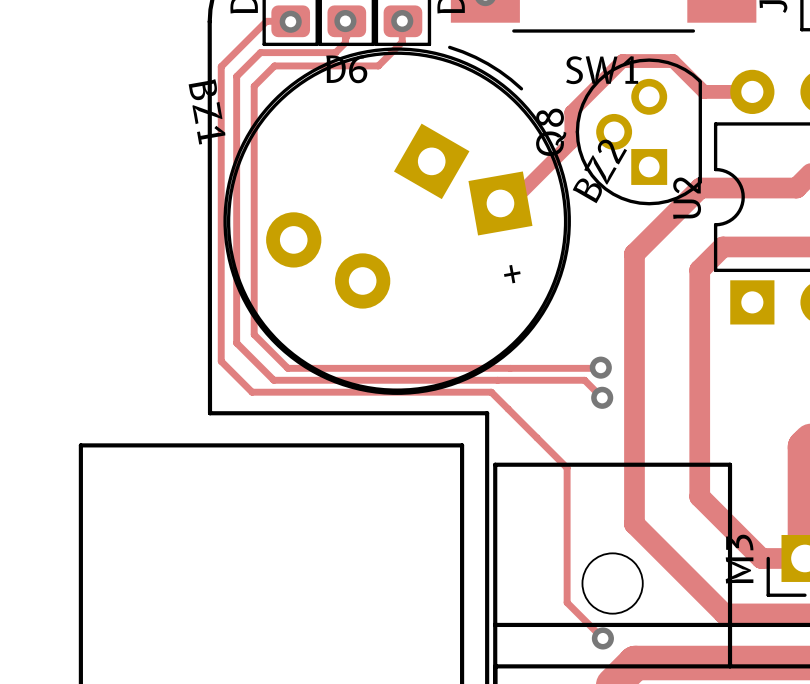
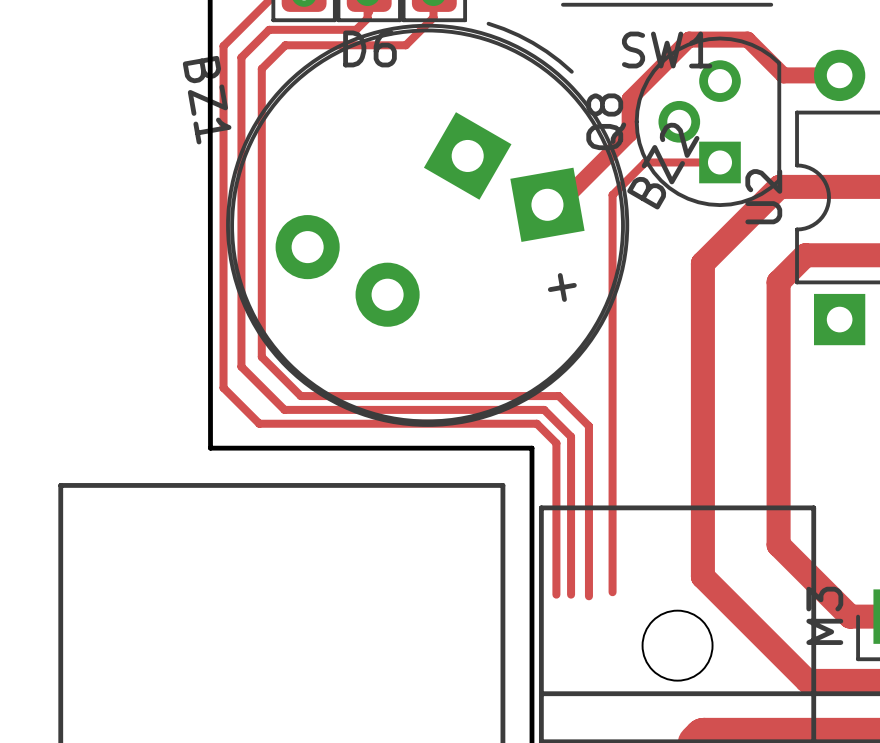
track: none -> (720, 162) (645, 162) (612, 195) (612, 592)
track: (600, 367) (510, 368) -> (588, 596) (588, 426) (558, 396)
via: (600, 367) -> none
track: (497, 380) (584, 380) (602, 397) -> (544, 409) (571, 436) (571, 594)
via: (602, 397) -> none
track: (508, 409) (567, 467) (567, 602) (602, 638) -> (556, 443) (556, 594)
via: (602, 638) -> none

